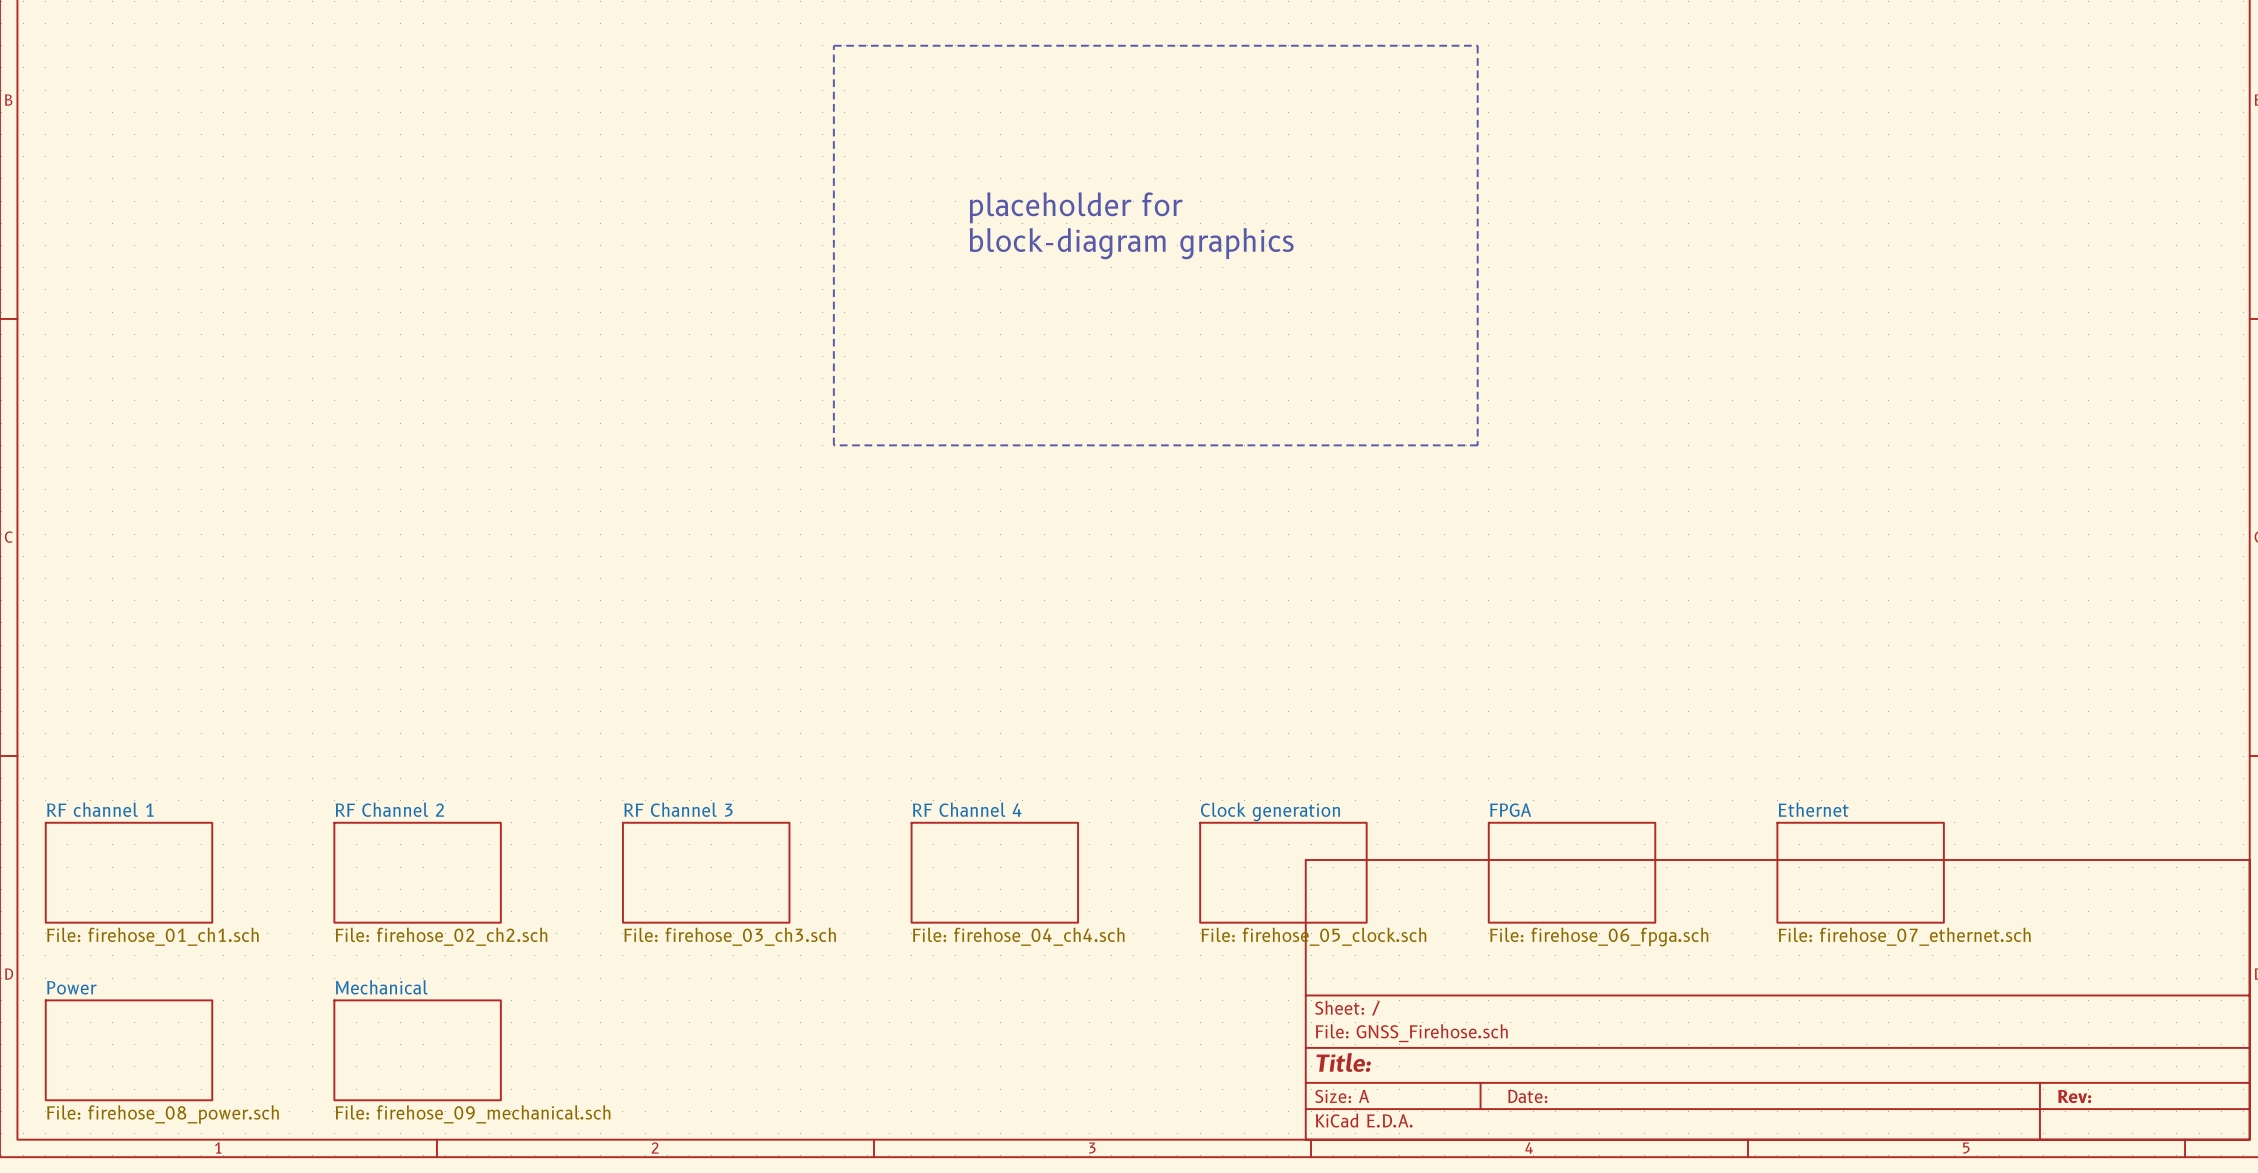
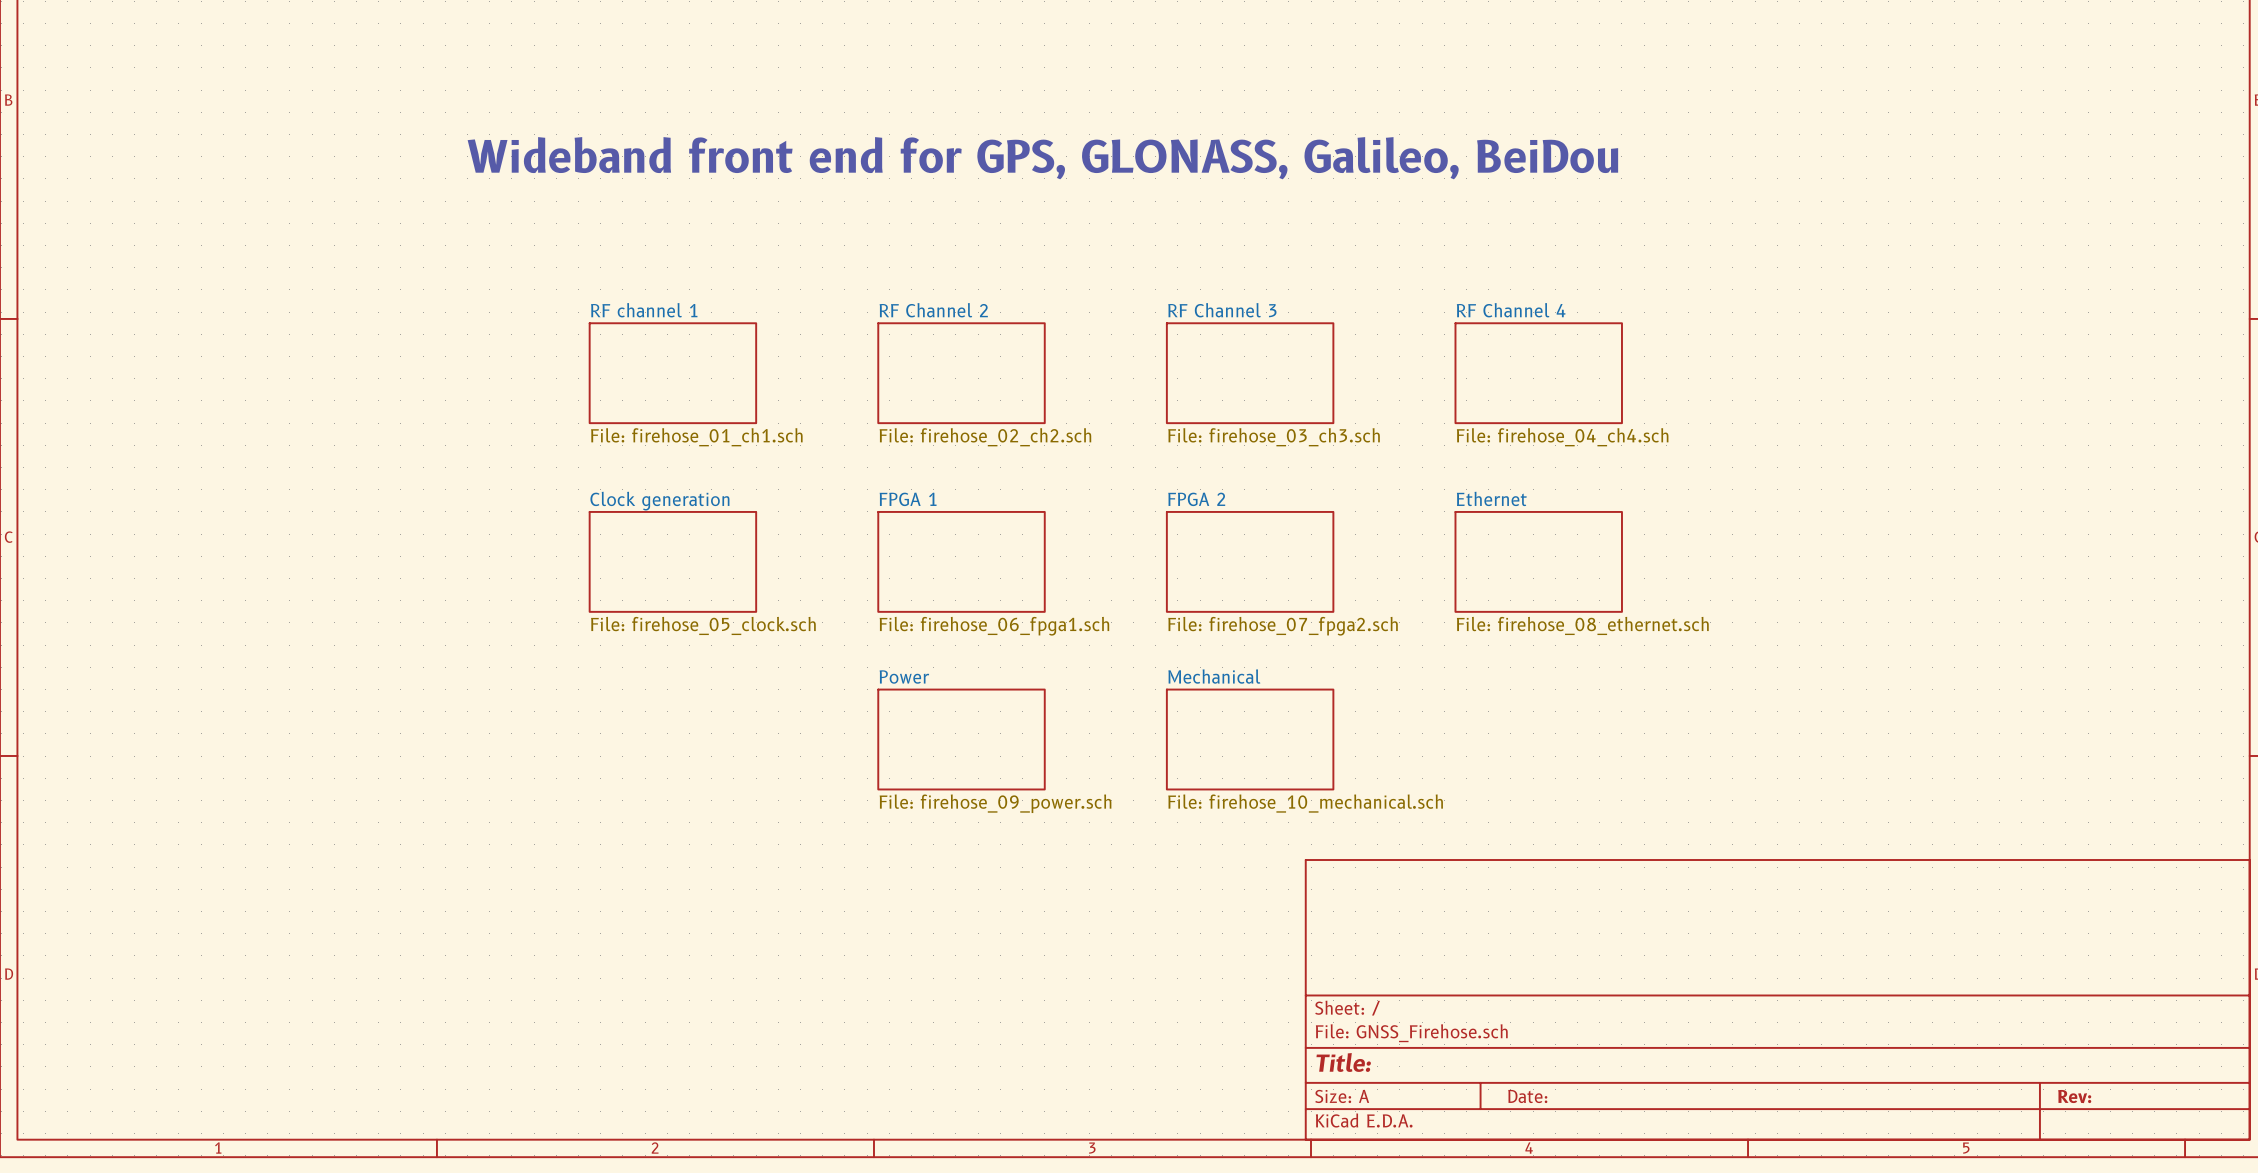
line: (833, 45) (1477, 45) (1477, 445) (833, 445) (833, 45) -> none
text: none -> Wideband front end for GPS, GLONASS, Galileo, BeiDou (1042, 158)
text: placeholder for (1076, 207) -> none
text: block-diagram graphics (1131, 243) -> none
sheet Clock generation: none -> File: firehose_05_clock.sch (672, 561)
sheet FPGA 1: none -> File: firehose_06_fpga1.sch (961, 561)
sheet FPGA 2: none -> File: firehose_07_fpga2.sch (1250, 561)
sheet Ethernet: none -> File: firehose_08_ethernet.sch (1538, 561)
sheet Power: none -> File: firehose_09_power.sch (961, 739)
sheet Mechanical: none -> File: firehose_10_mechanical.sch (1250, 739)
sheet RF channel 1 position: (129, 872) -> (672, 373)
sheet RF Channel 2 position: (417, 872) -> (961, 373)
sheet RF Channel 3 position: (706, 872) -> (1250, 373)
sheet RF Channel 4 position: (994, 872) -> (1538, 373)
sheet Clock generation: File: firehose_05_clock.sch (1283, 872) -> none
sheet FPGA: File: firehose_06_fpga.sch (1572, 872) -> none
sheet Ethernet: File: firehose_07_ethernet.sch (1860, 872) -> none
sheet Power: File: firehose_08_power.sch (129, 1050) -> none
sheet Mechanical: File: firehose_09_mechanical.sch (417, 1050) -> none

